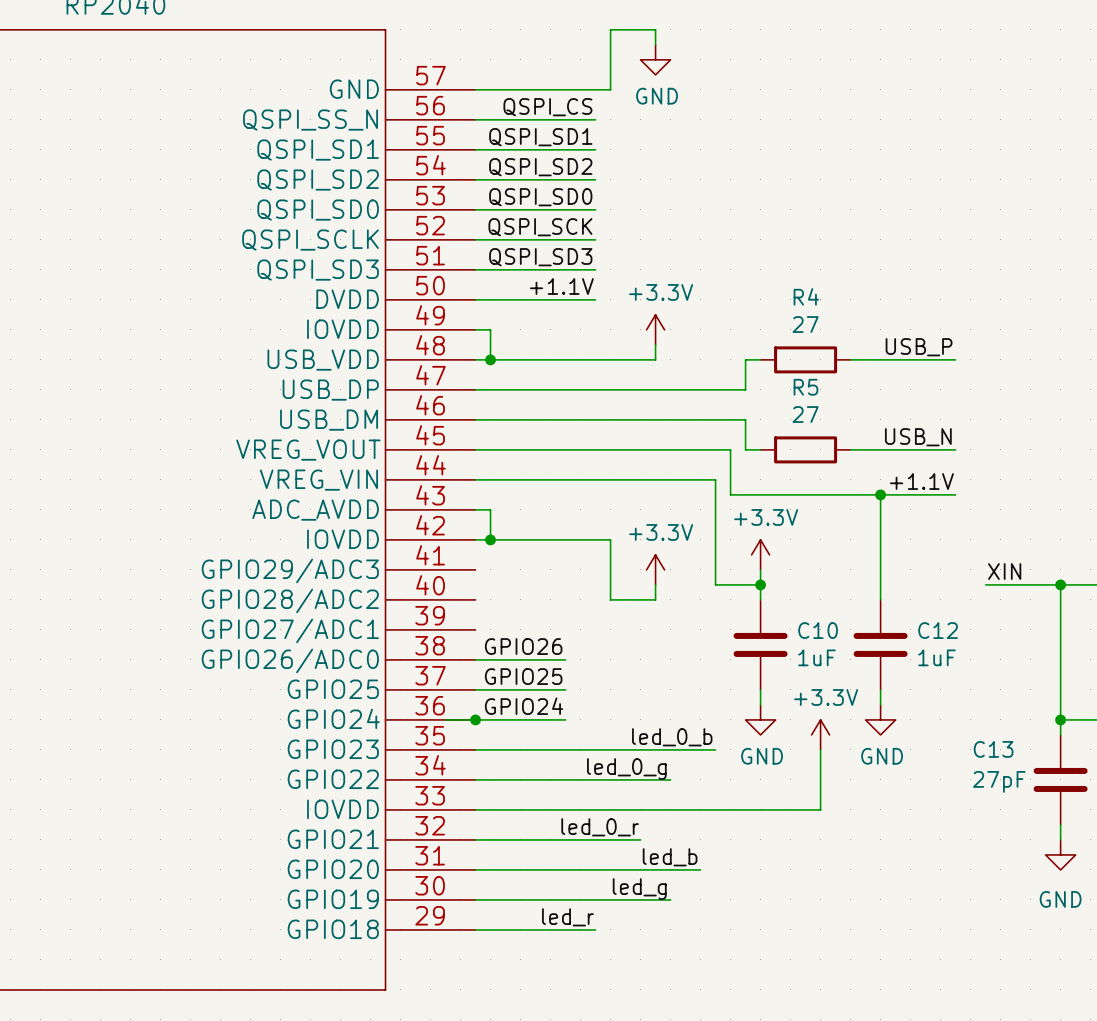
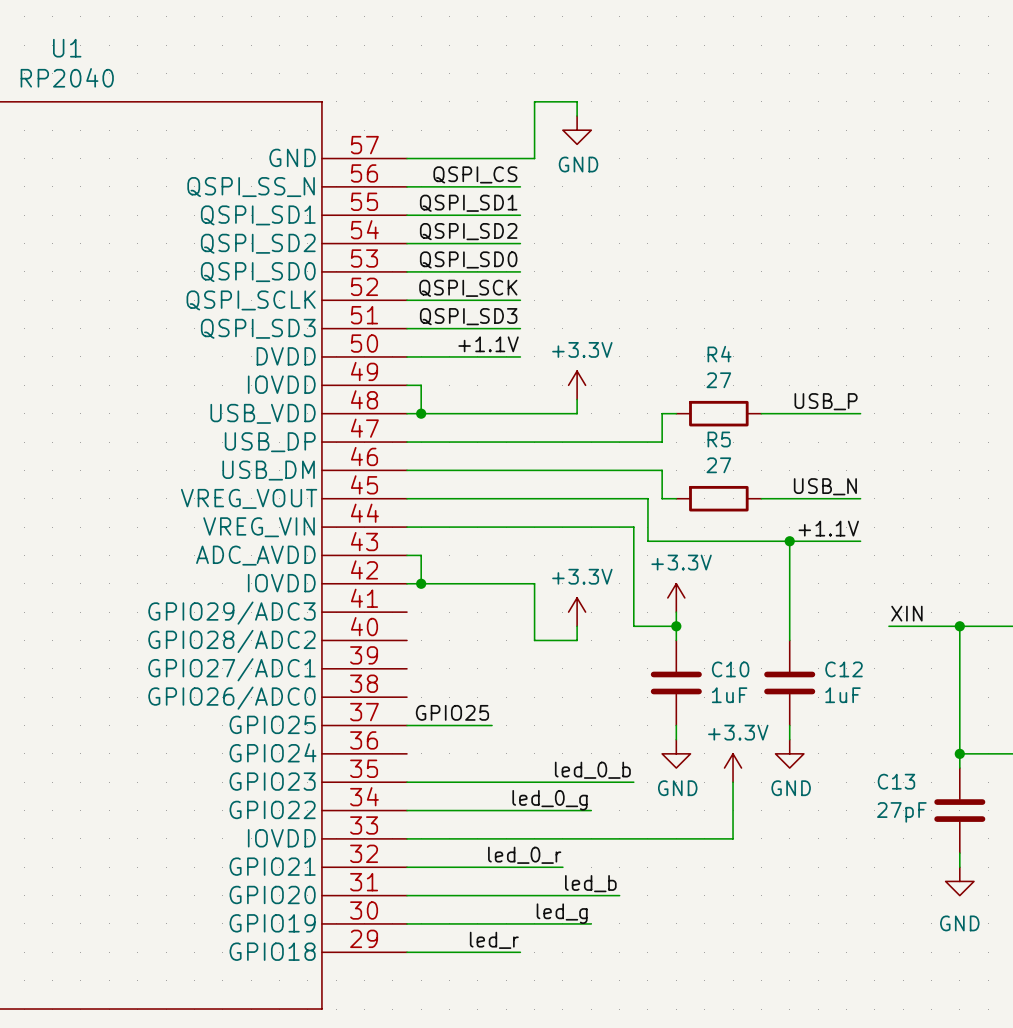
label: GPIO26 (523, 646) -> none
wire: (475, 659) (565, 659) -> none
label: GPIO24 (523, 706) -> none
wire: (445, 719) (565, 719) -> none
junction: (475, 719) -> none

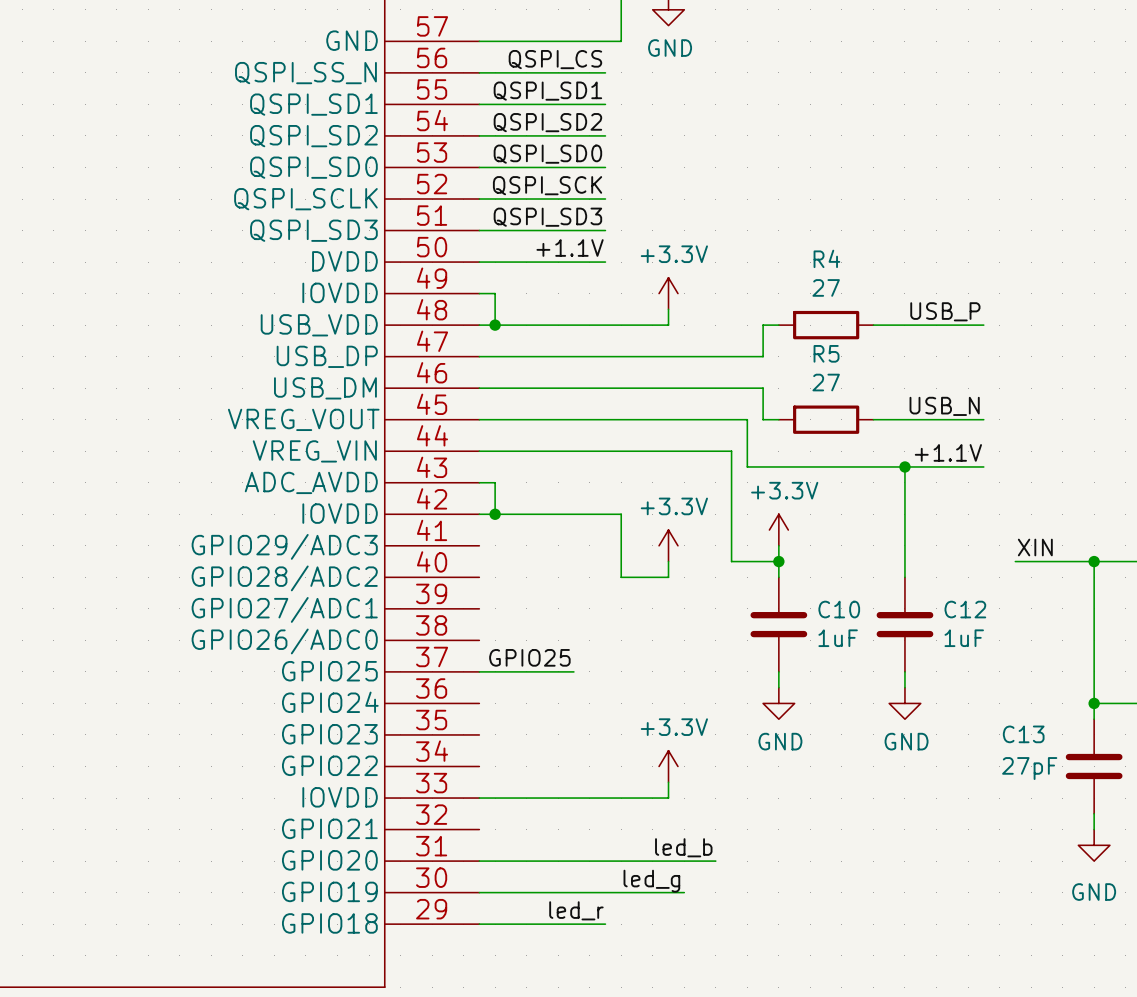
power symbol position: +3.3V (733, 768) -> +3.3V (668, 766)
label: led_0_b (592, 770) -> none
wire: (407, 782) (633, 782) -> none
wire: (733, 782) (733, 838) (577, 838) -> (668, 782) (668, 798)
label: led_0_g (549, 800) -> none
wire: (407, 810) (591, 810) -> none
label: led_0_r (524, 855) -> none
wire: (407, 867) (562, 867) -> none

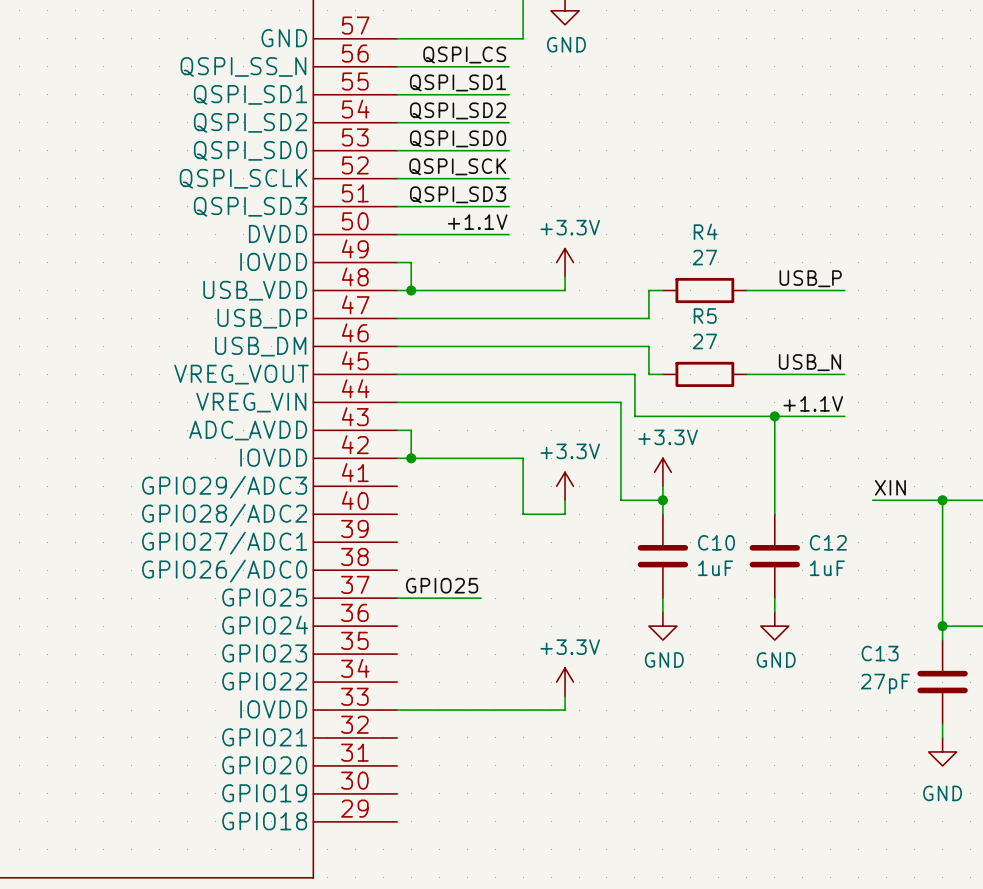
label: led_b (683, 847) -> none
wire: (479, 861) (715, 861) -> none
label: led_g (651, 881) -> none
wire: (479, 892) (684, 892) -> none
label: led_r (576, 910) -> none
wire: (479, 924) (605, 924) -> none

